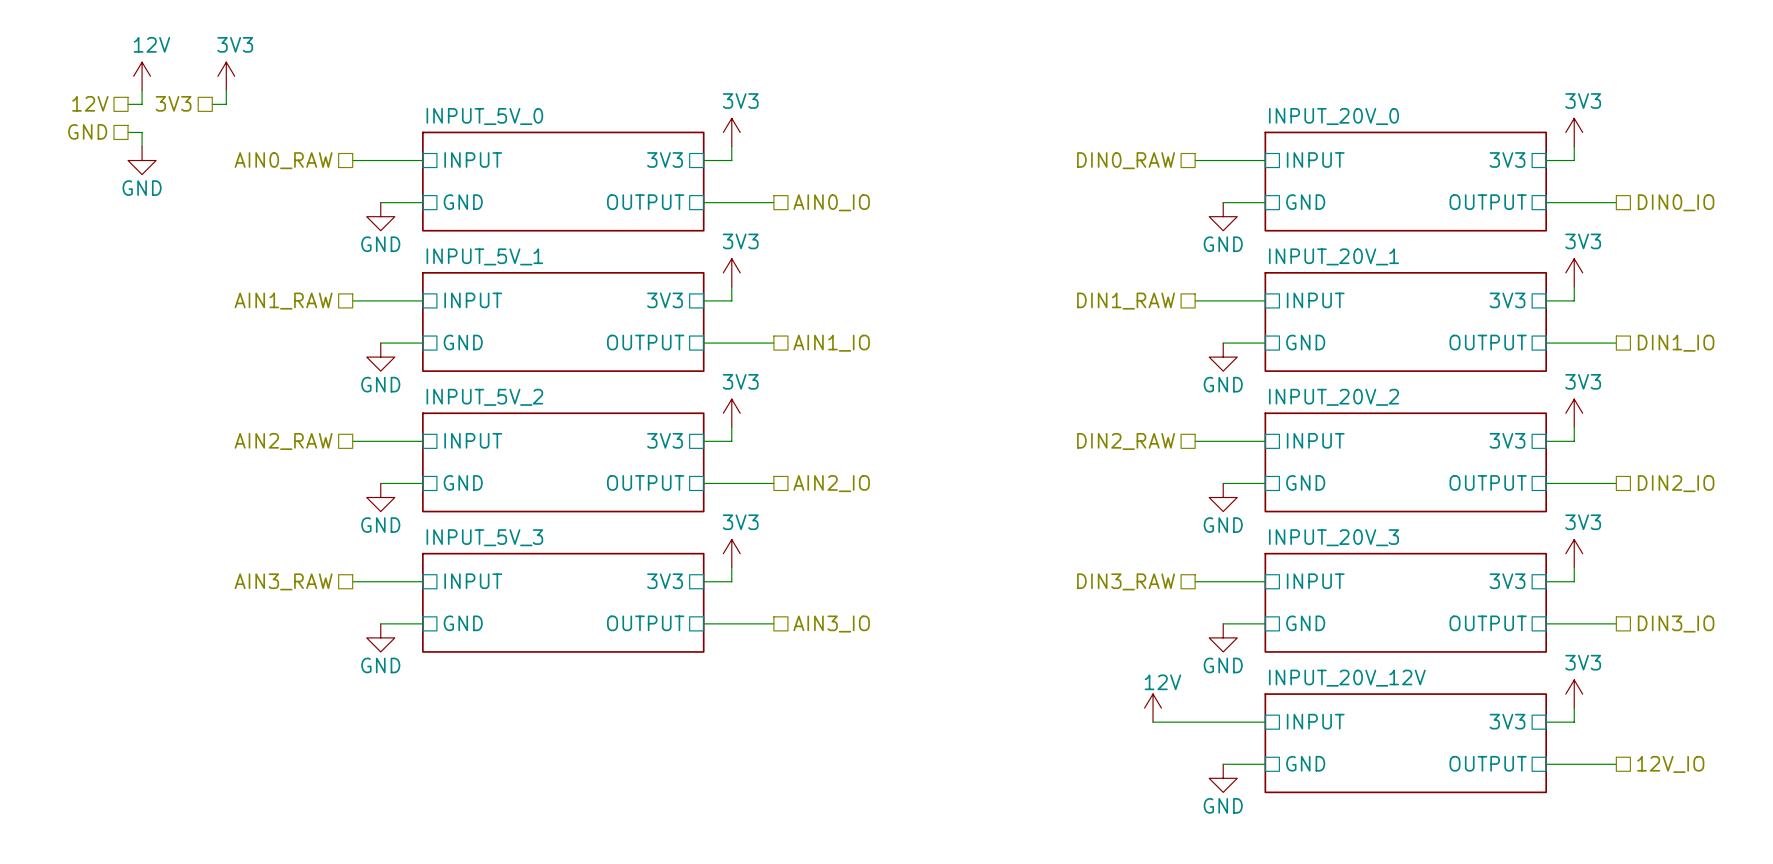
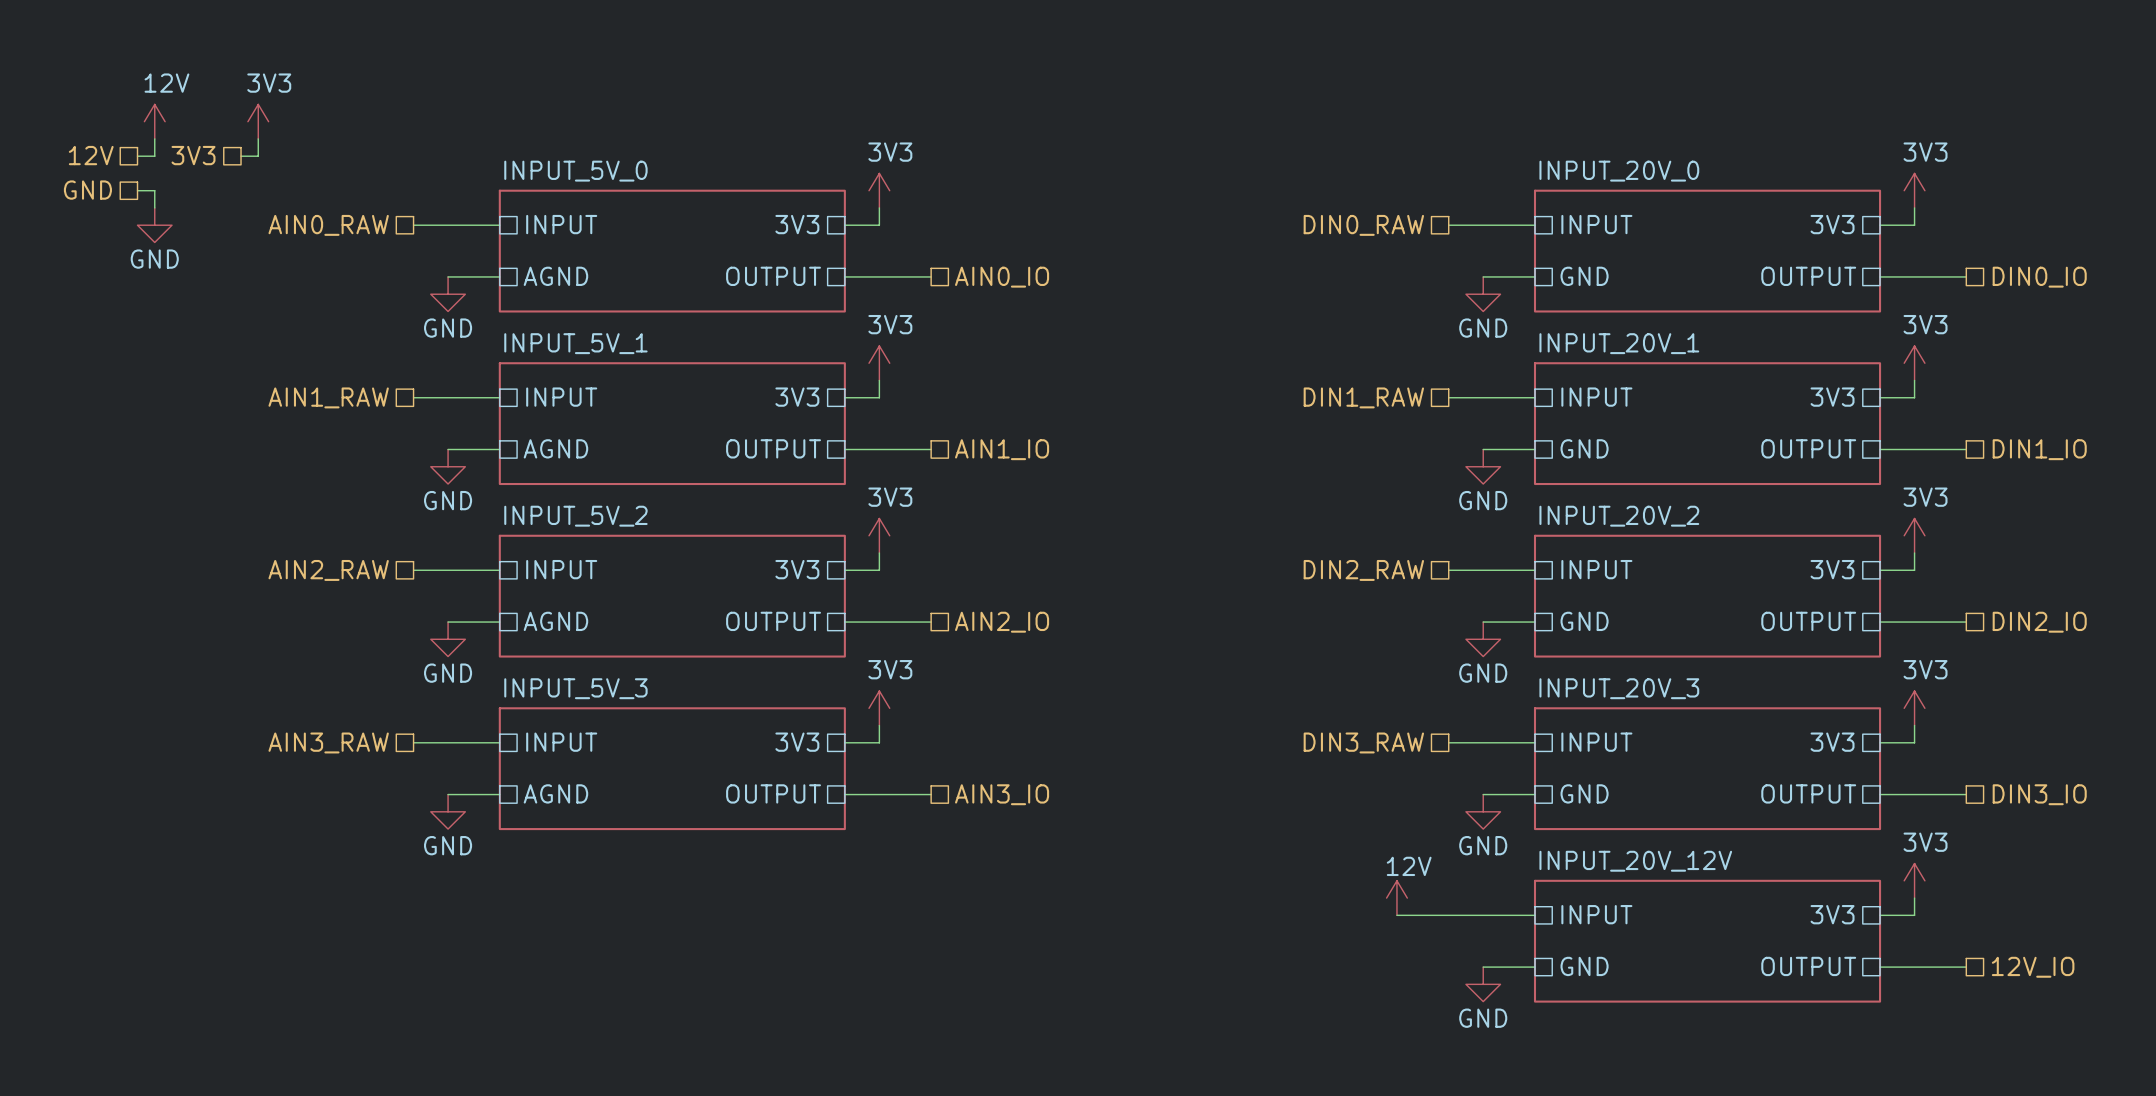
sheet pin: GND (463, 202) -> AGND (555, 276)
sheet pin: GND (463, 342) -> AGND (555, 448)
sheet pin: GND (463, 482) -> AGND (555, 621)
sheet pin: GND (463, 623) -> AGND (555, 793)

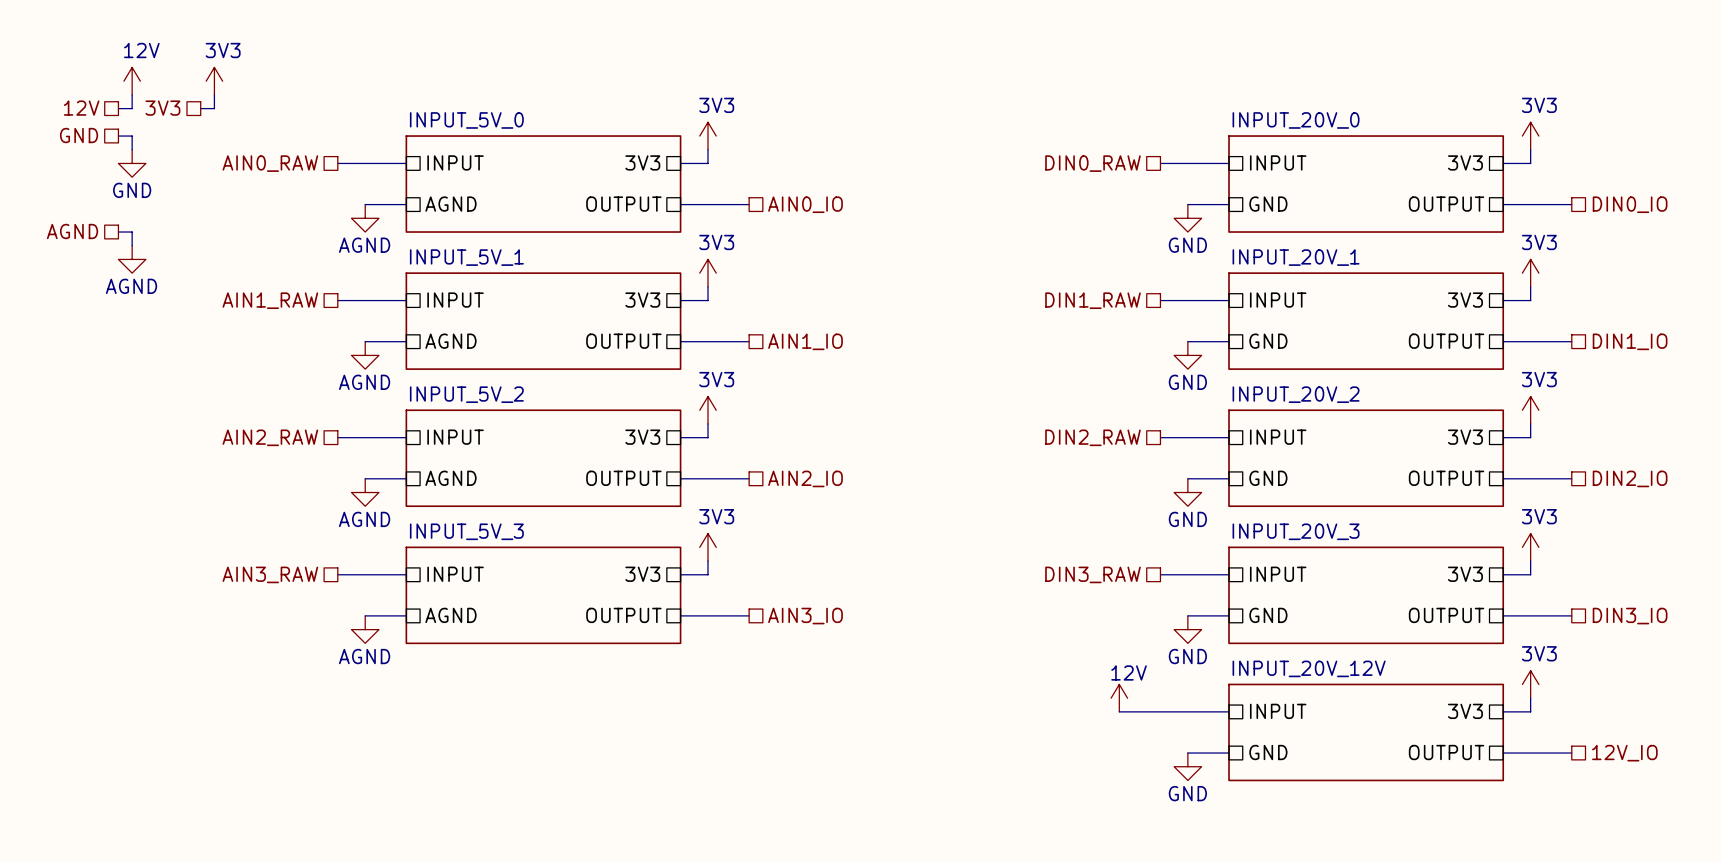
power symbol: GND (448, 294) -> AGND (365, 218)
hierarchical label: none -> AGND (72, 231)
wire: none -> (118, 232) (132, 232) (132, 245)
power symbol: none -> AGND (132, 259)
power symbol: GND (448, 466) -> AGND (365, 355)
power symbol: GND (448, 639) -> AGND (365, 492)
power symbol: GND (448, 811) -> AGND (365, 629)

